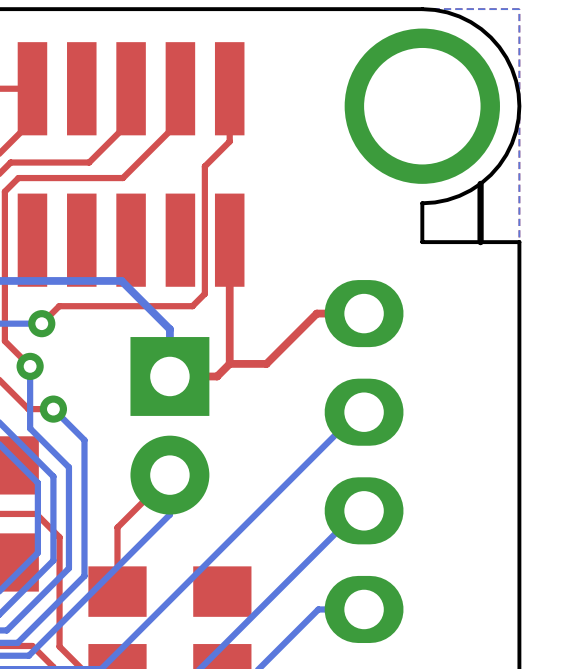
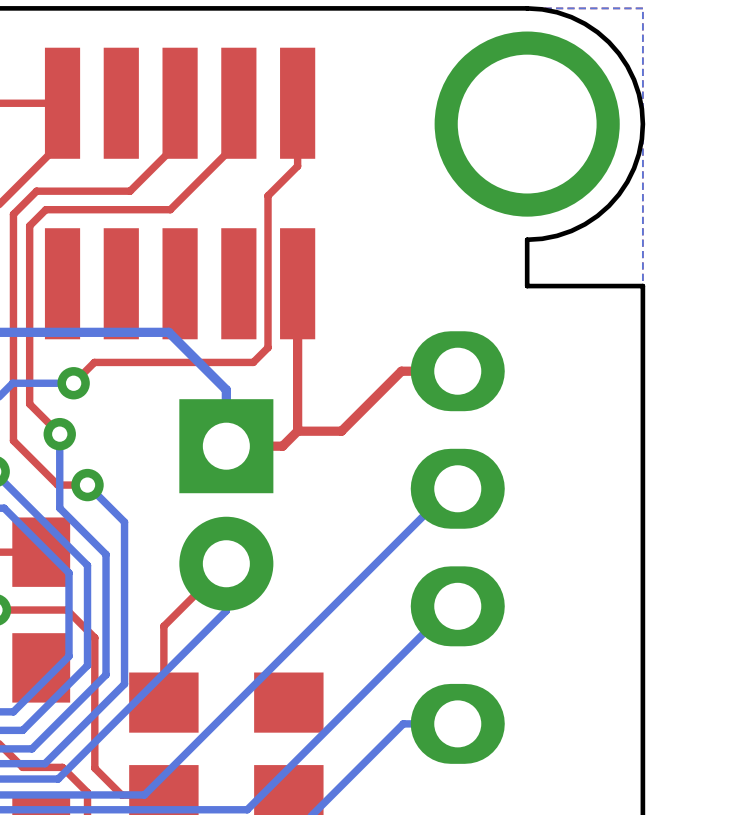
board edge: (480, 183) (480, 242) -> none

